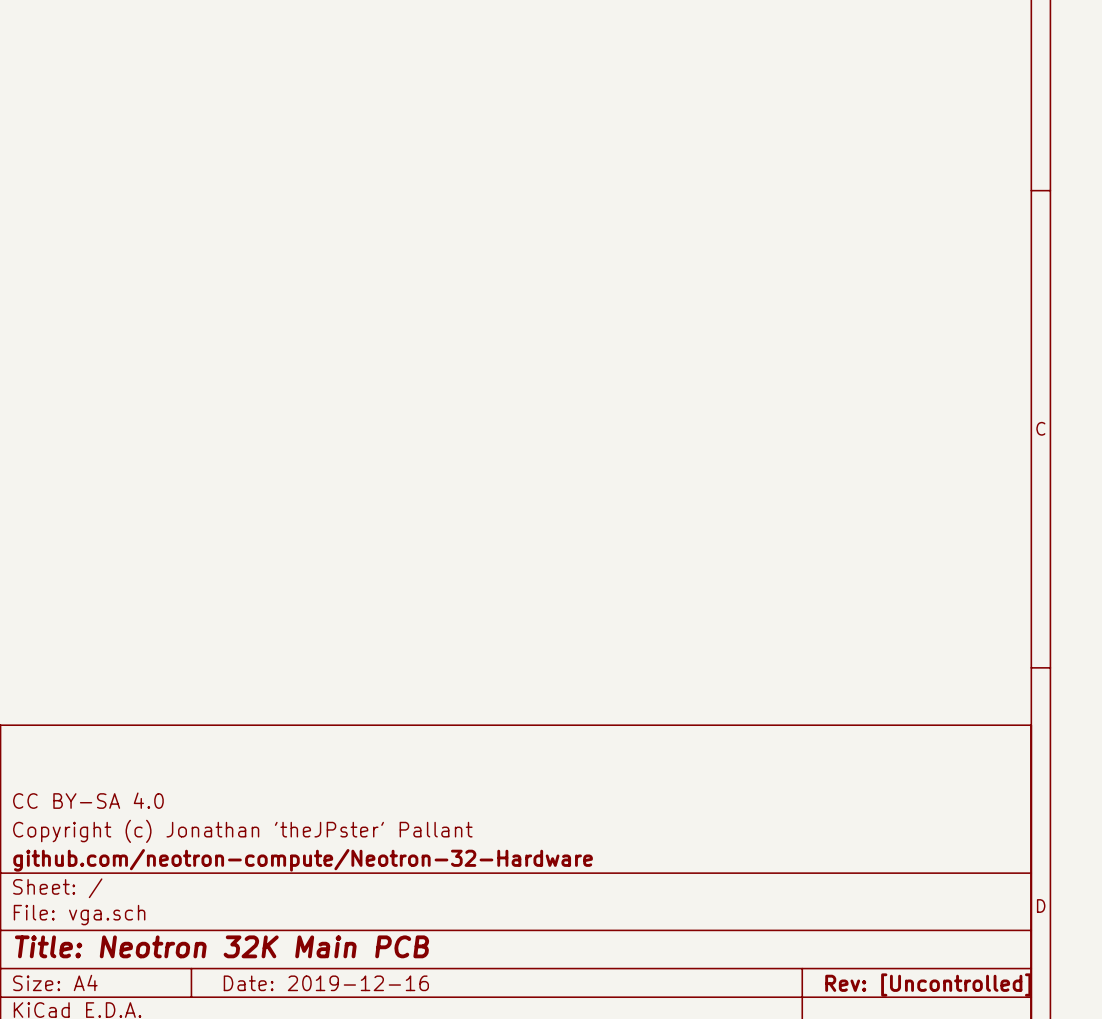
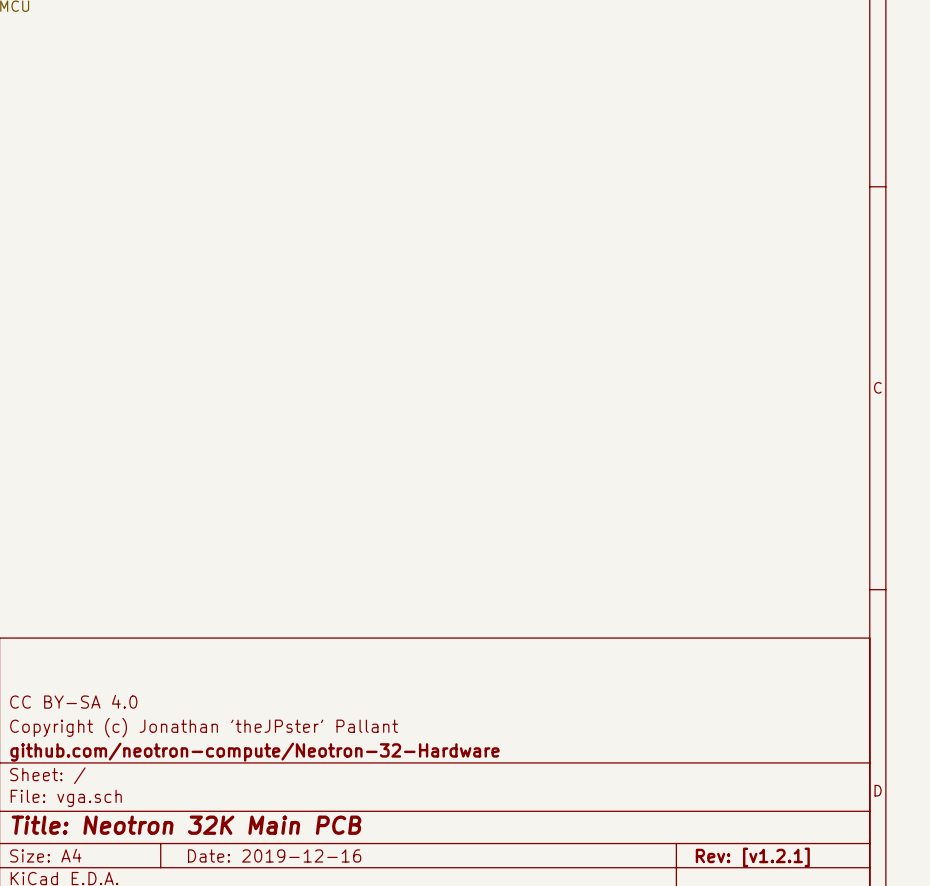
title block: Rev: [Uncontrolled] (928, 985) -> Rev: [v1.2.1] (752, 857)

